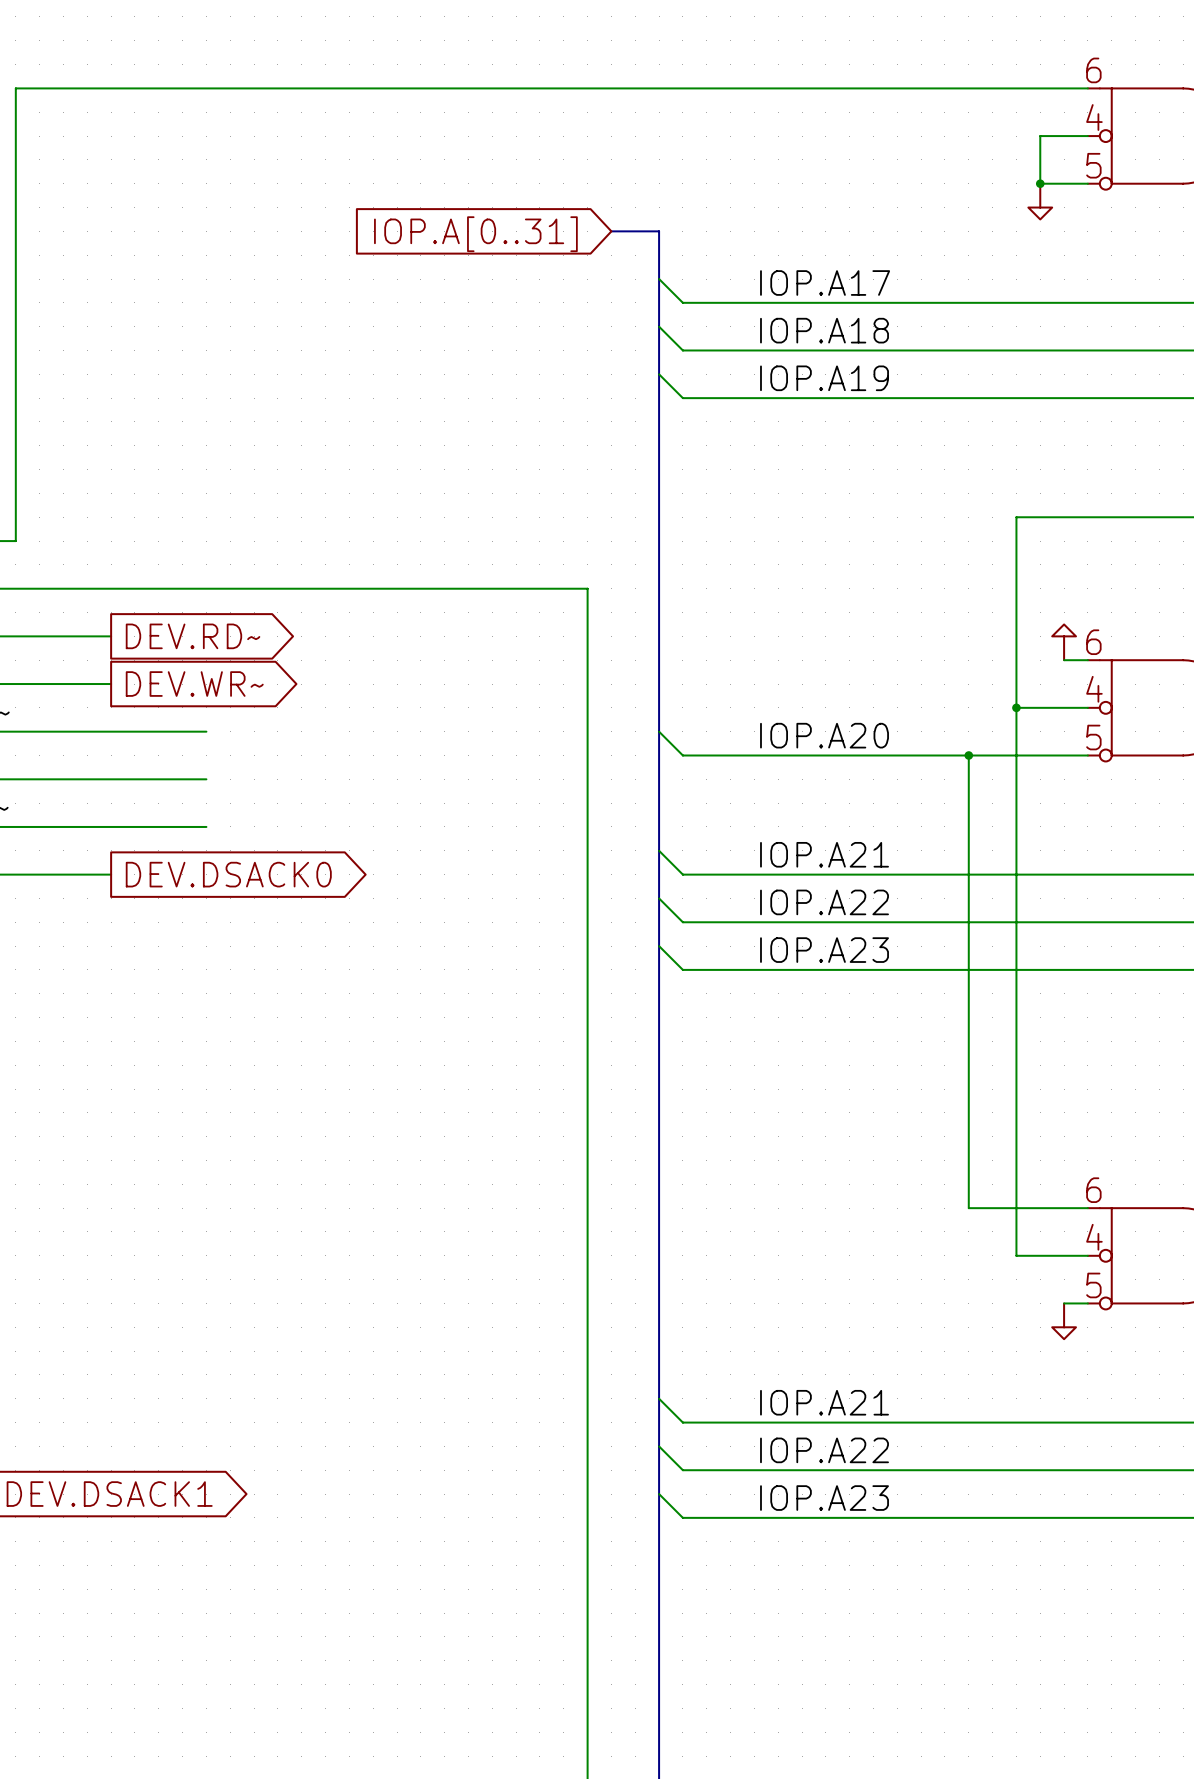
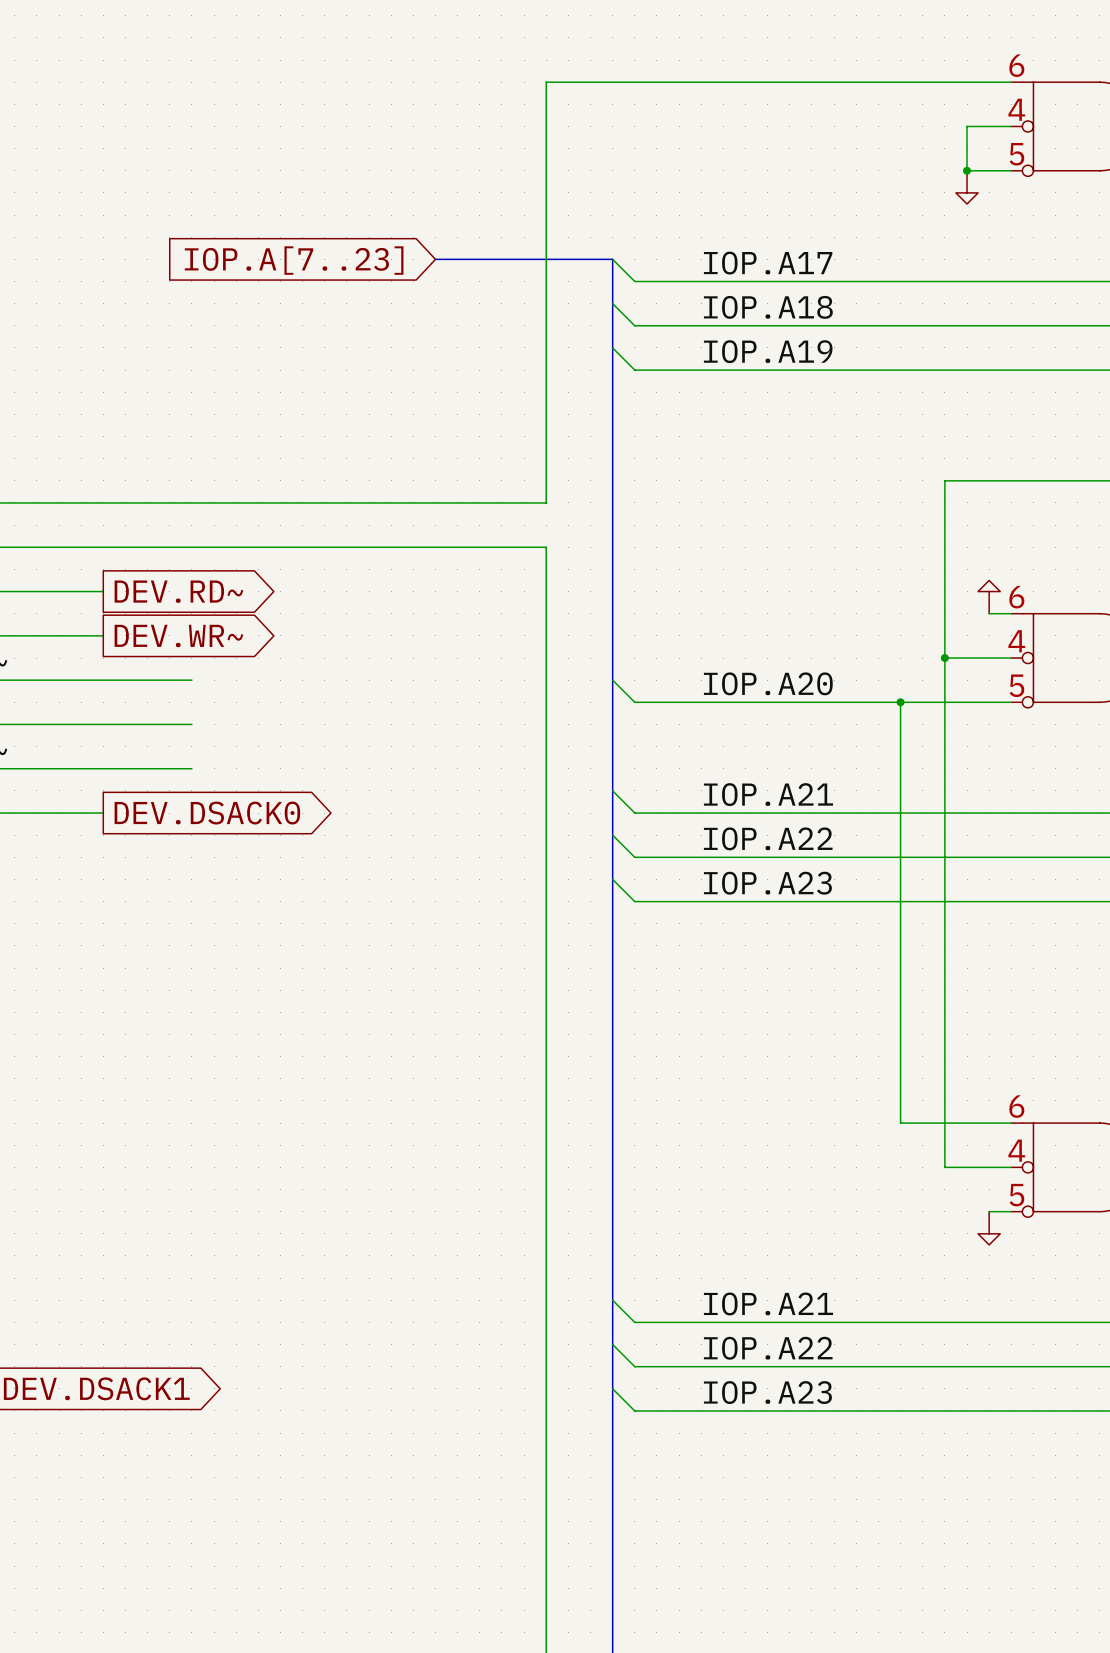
wire: (587, 88) (15, 88) (15, 541) -> (546, 82) (546, 502) (14, 502)
bus: (611, 231) (659, 231) (659, 279) -> (435, 259) (612, 259)
global label: IOP.A[0..31] (475, 234) -> IOP.A[7..23] (294, 260)

